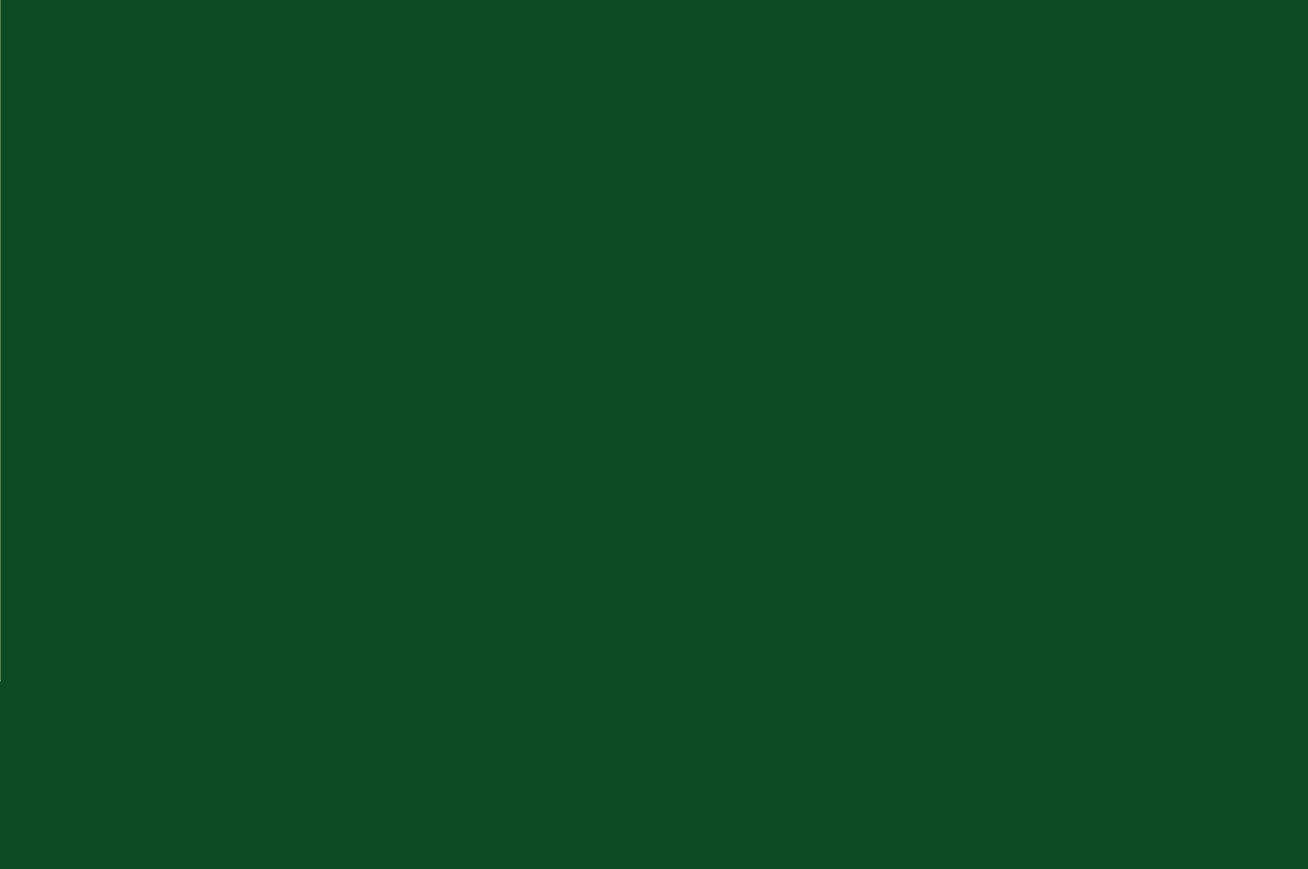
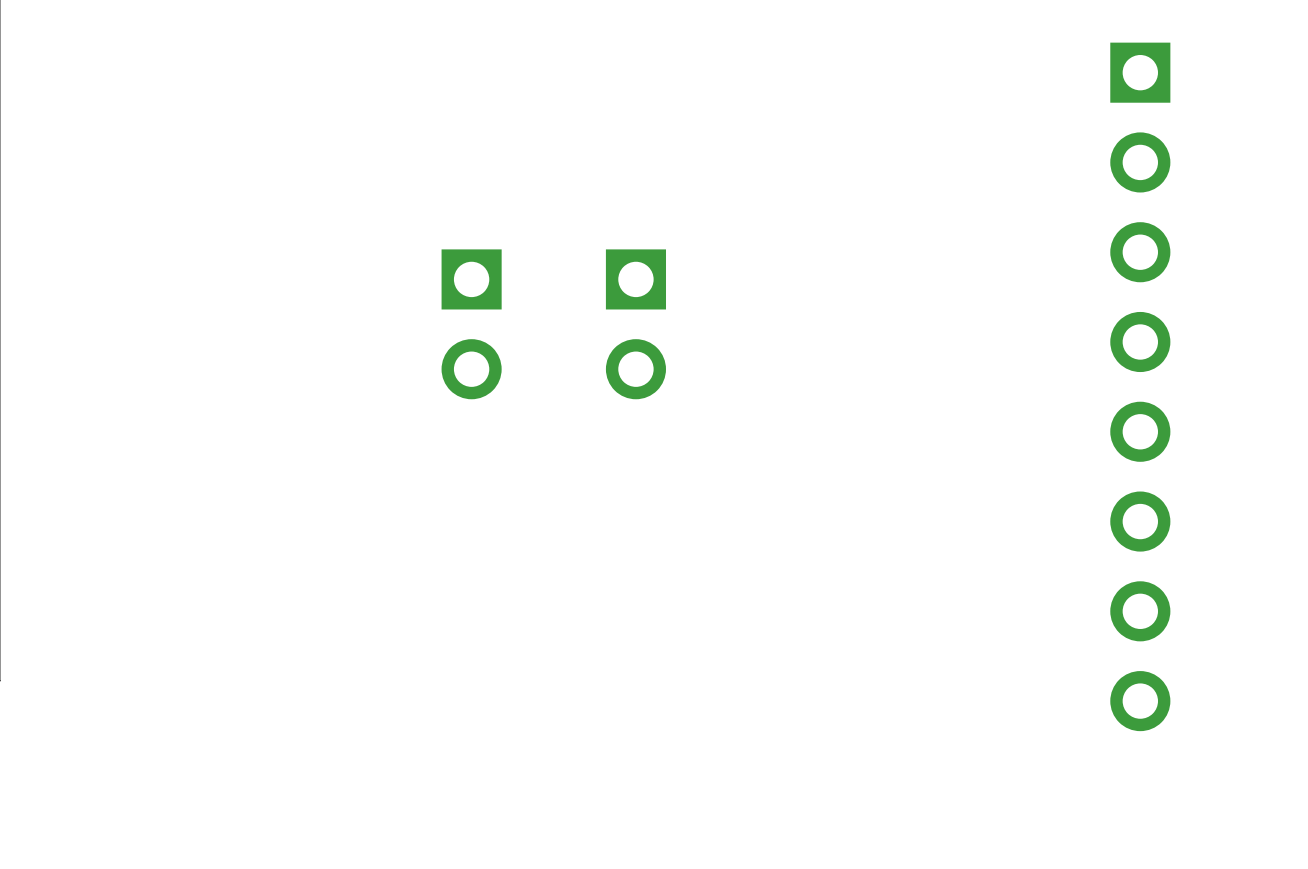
part: none -> (471, 324)
part: none -> (635, 324)
part: none -> (1140, 386)

